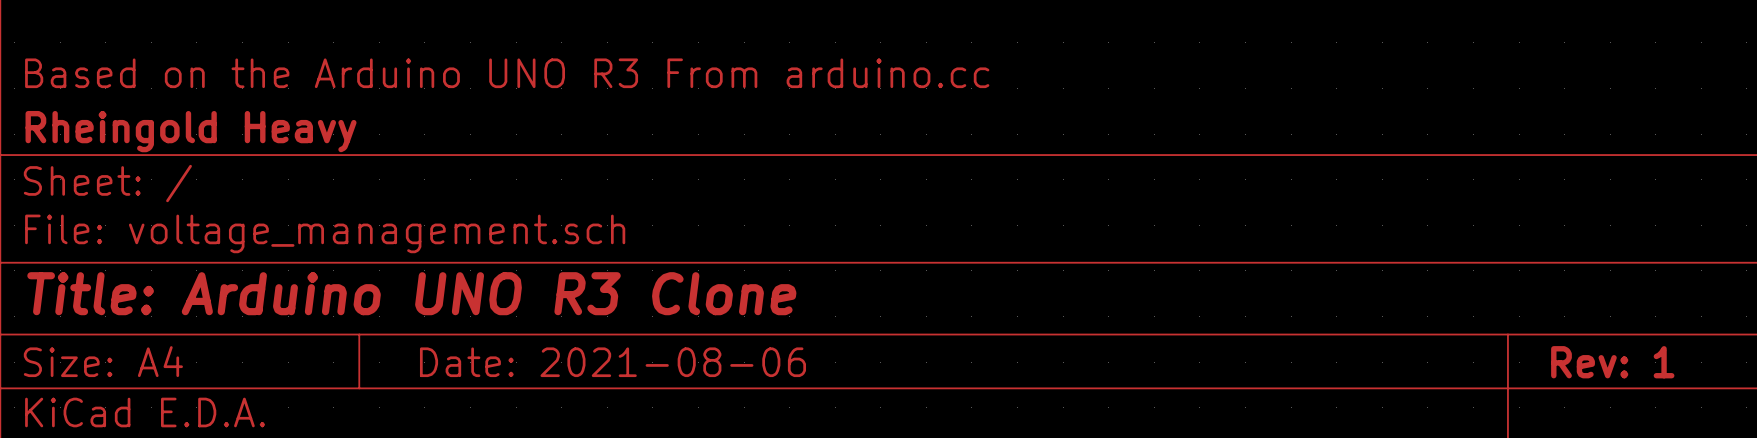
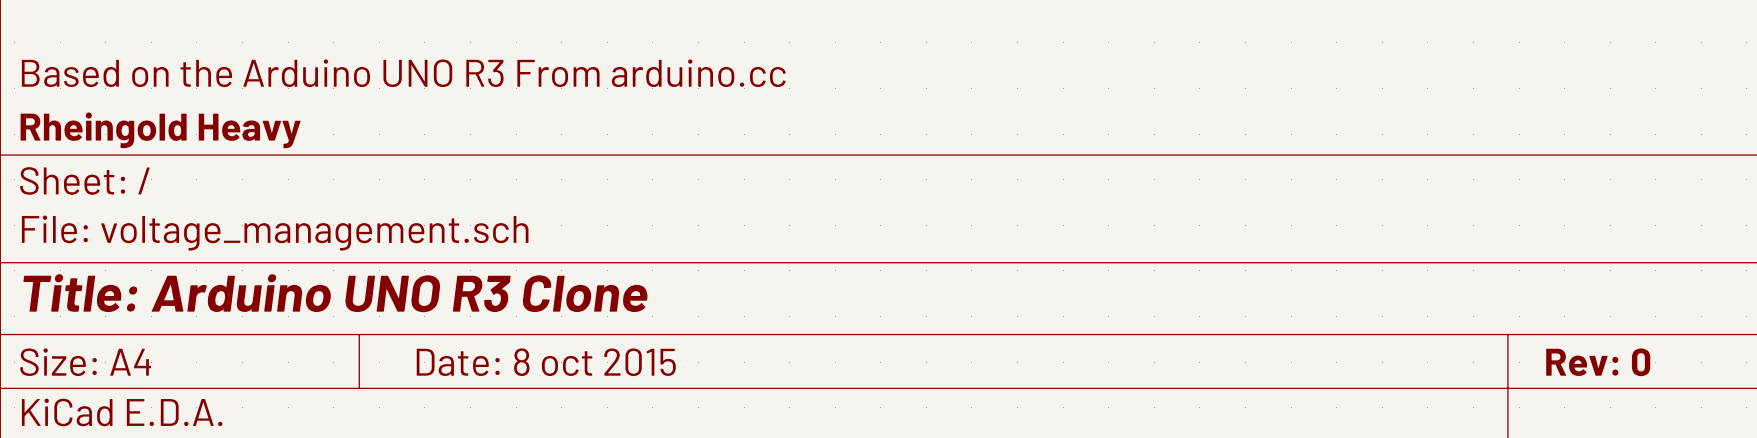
title block: Date: 2021-08-06 (612, 362) -> Date: 8 oct 2015 (546, 362)
title block: Rev: 1 (1612, 362) -> Rev: 0 (1598, 362)

